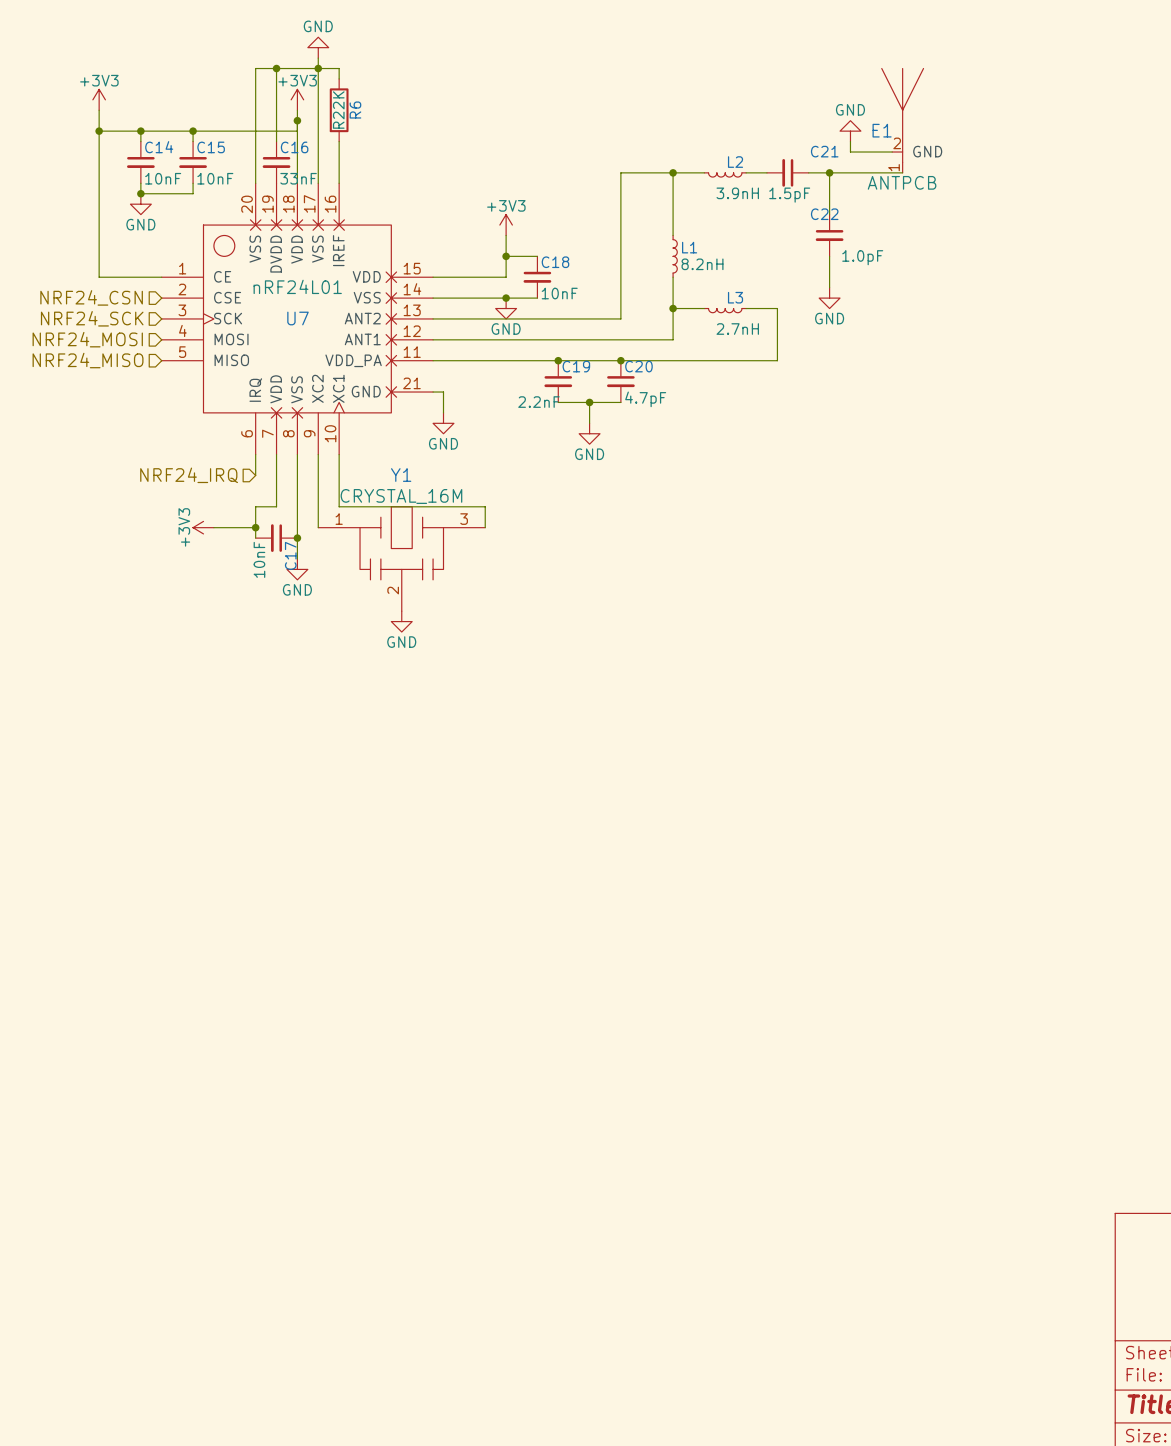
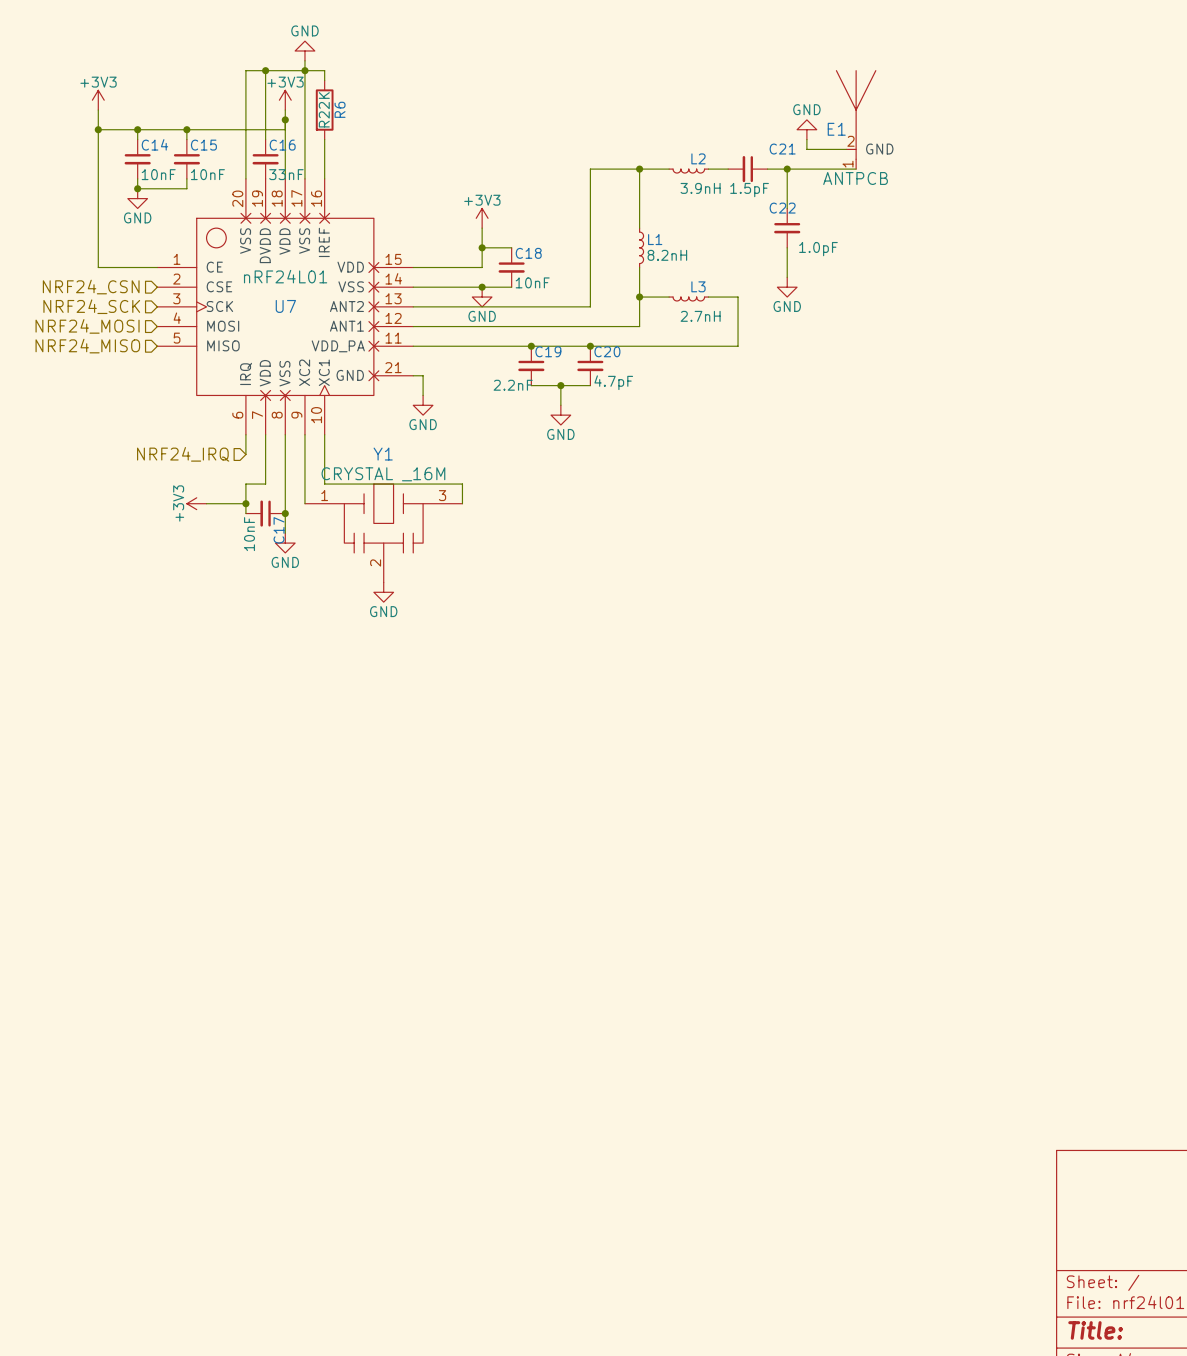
Y1 value: CRYSTAL_16M (401, 496) -> CRYSTAL _16M (383, 474)

